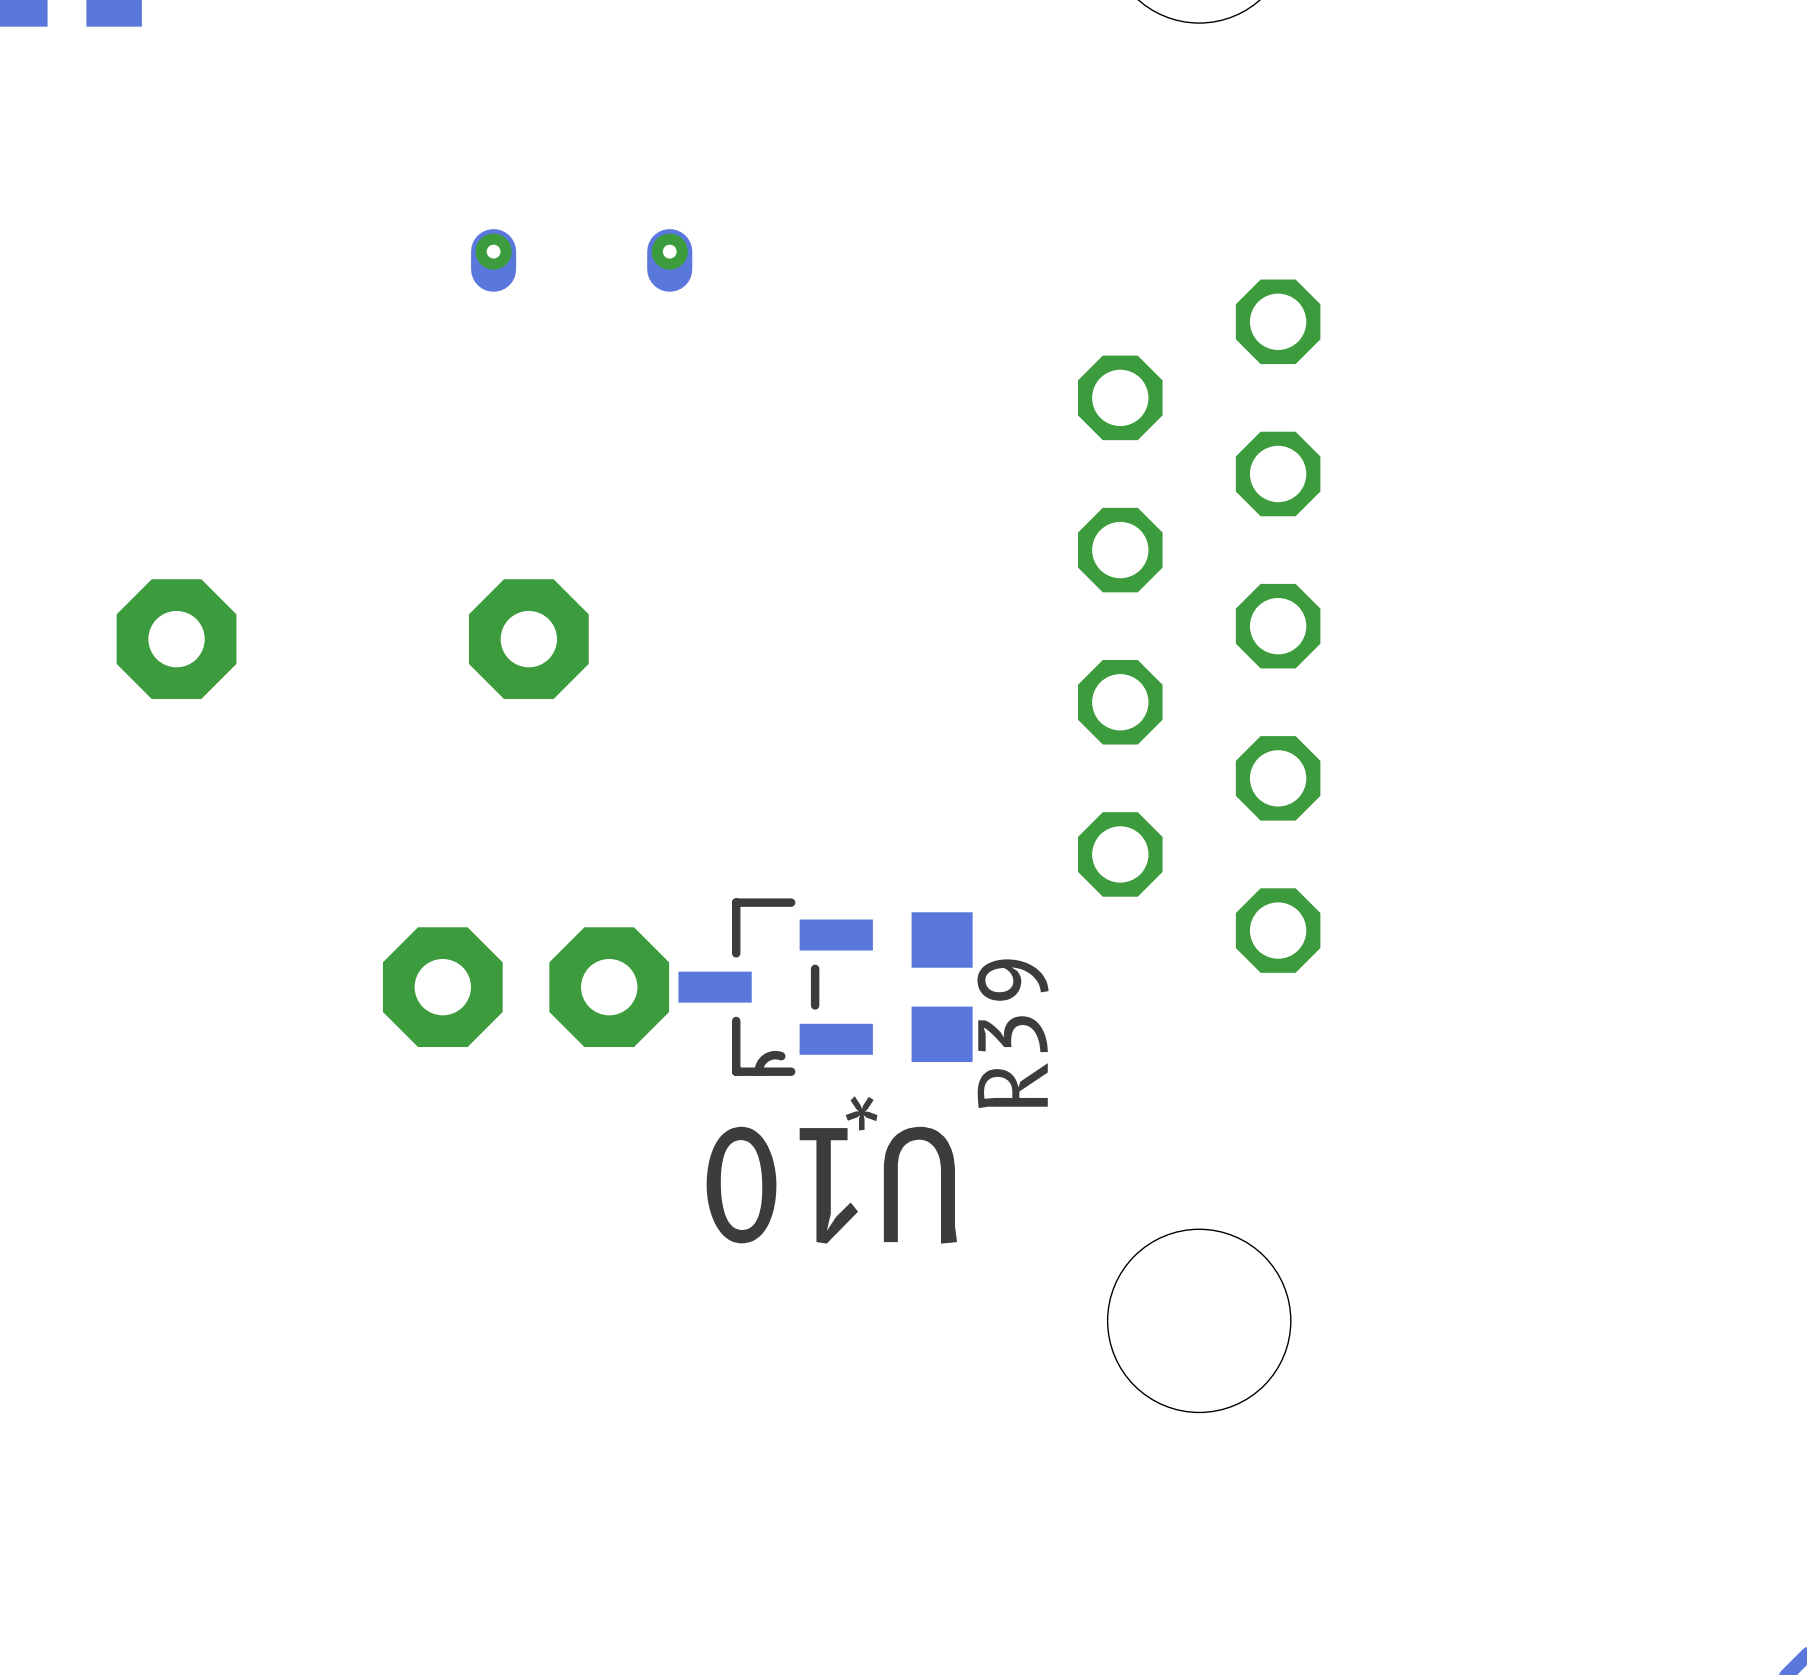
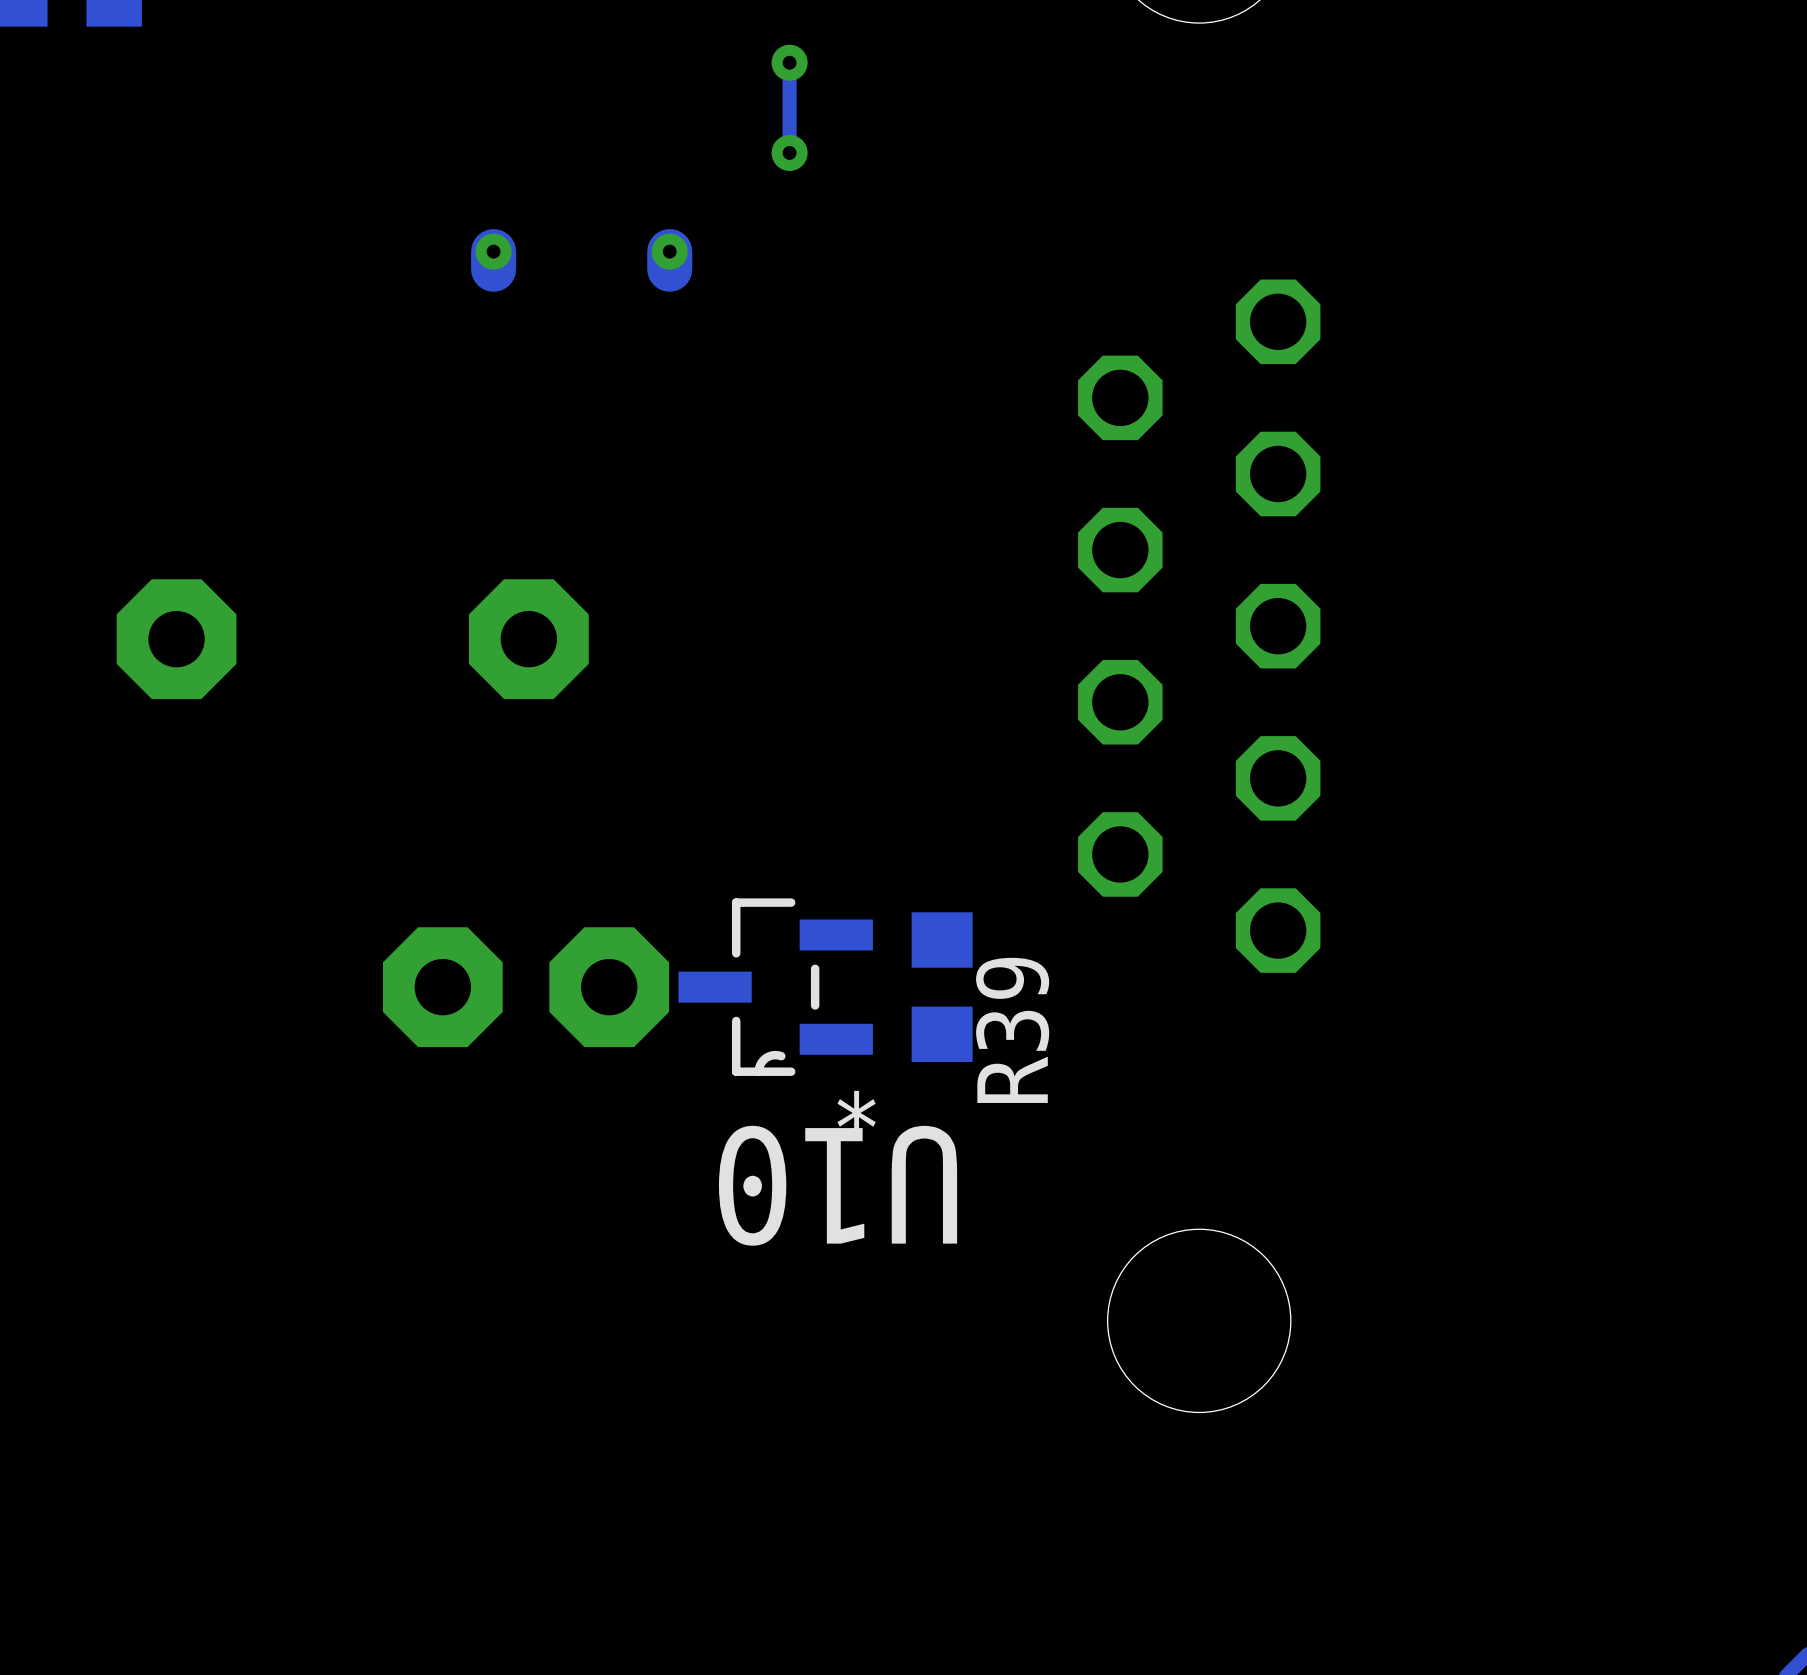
track: none -> (789, 62) (789, 152)
via: none -> (789, 62)
via: none -> (789, 152)

